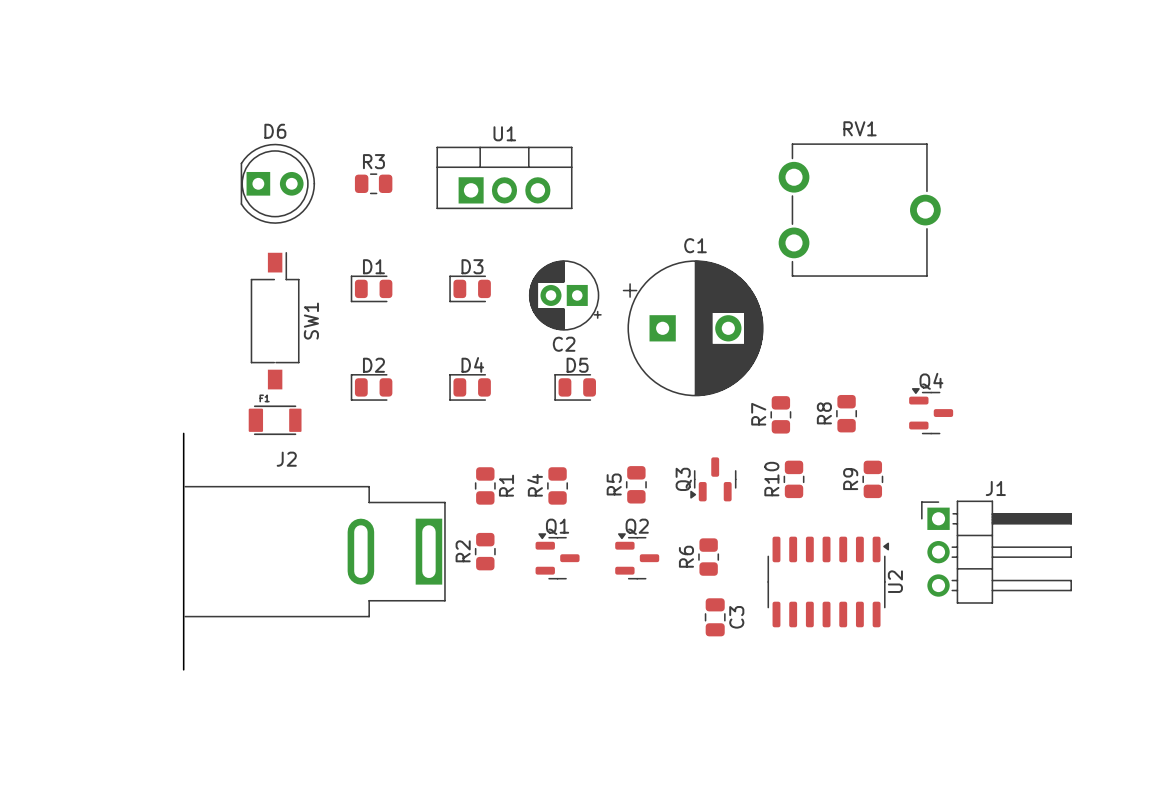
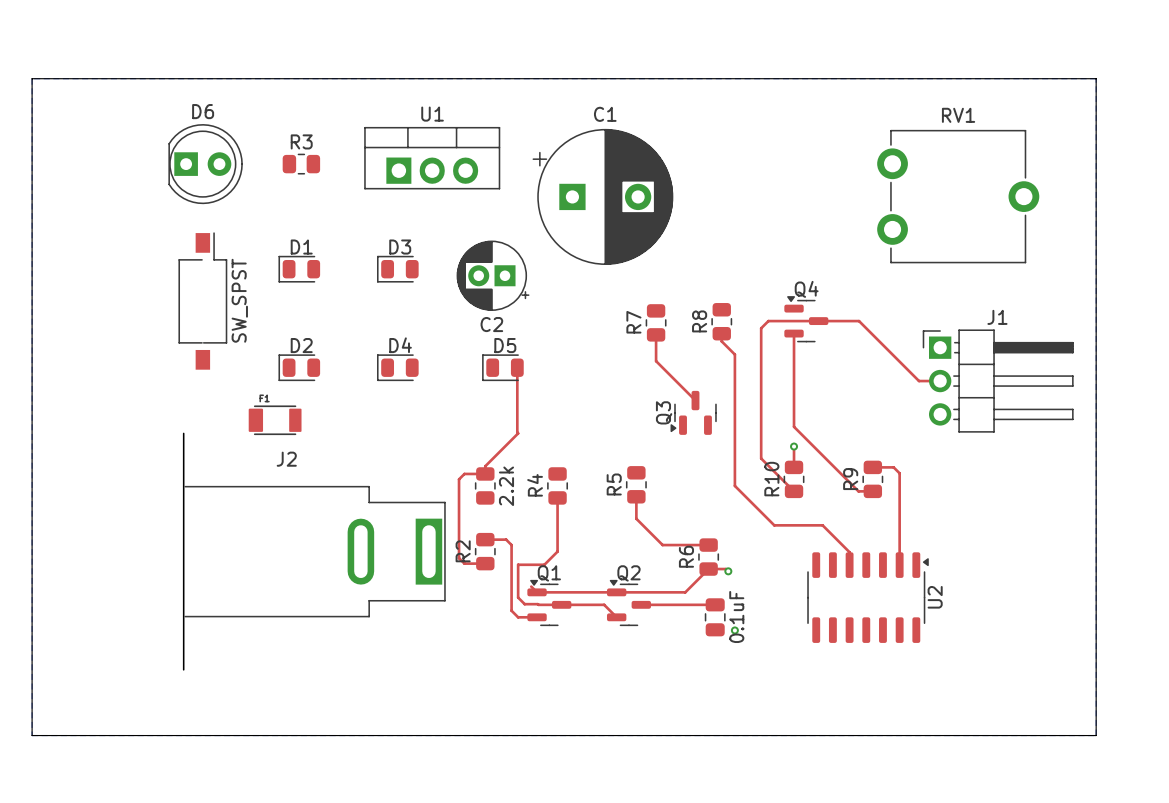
board edge: none -> (32, 78) (1096, 78) (1096, 735) (32, 735) (32, 78)
U1 position: (504, 177) -> (432, 158)
D6 position: (277, 183) -> (205, 164)
R3 position: (373, 183) -> (301, 164)
RV1 position: (859, 210) -> (958, 196)
D1 position: (371, 288) -> (299, 269)
D3 position: (470, 288) -> (397, 269)
C2 position: (565, 295) -> (493, 275)
part: none -> SW_SPST (202, 300)
SW1: (275, 320) -> none
C1 position: (693, 328) -> (602, 196)
top track: none -> (721, 333) (721, 341) (734, 354) (734, 485) (774, 525) (822, 525) (849, 552) (849, 565)
top track: none -> (794, 333) (794, 426) (858, 491) (872, 491)
top track: none -> (656, 334) (656, 361) (695, 400)
top track: none -> (518, 367) (518, 433) (485, 466) (485, 473) (464, 473) (459, 479) (459, 558) (464, 563) (485, 563)
top track: none -> (940, 381) (919, 381) (859, 321) (768, 321) (761, 328) (761, 458) (794, 491)
D2 position: (371, 387) -> (299, 367)
D4 position: (470, 387) -> (397, 367)
D5 position: (575, 387) -> (502, 367)
Q4 position: (931, 411) -> (806, 319)
R8 position: (846, 413) -> (721, 321)
R7 position: (780, 414) -> (656, 322)
top track: none -> (794, 446) (794, 467)
via: none -> (794, 446)
top track: none -> (872, 467) (893, 467) (899, 473) (899, 565)
Q3 position: (713, 479) -> (693, 412)
R1 name: R1 (506, 485) -> none
R1 value: none -> 2.2k (506, 486)
top track: none -> (636, 496) (636, 518) (662, 545) (708, 545)
top track: none -> (557, 497) (557, 551) (544, 564) (518, 564) (518, 597) (524, 604) (604, 604) (616, 617)
top track: none -> (485, 539) (506, 539) (511, 545) (511, 610) (518, 617) (537, 617)
J1 position: (996, 552) -> (998, 381)
Q1 position: (557, 556) -> (549, 602)
Q2 position: (637, 556) -> (628, 602)
top track: none -> (728, 571) (726, 569) (708, 569) (685, 592) (537, 592) (531, 586)
via: none -> (728, 571)
U2 position: (828, 581) -> (868, 597)
top track: none -> (641, 604) (715, 604)
C3 name: C3 (736, 617) -> none
C3 value: none -> 0.1uF (736, 617)
via: none -> (734, 630)

